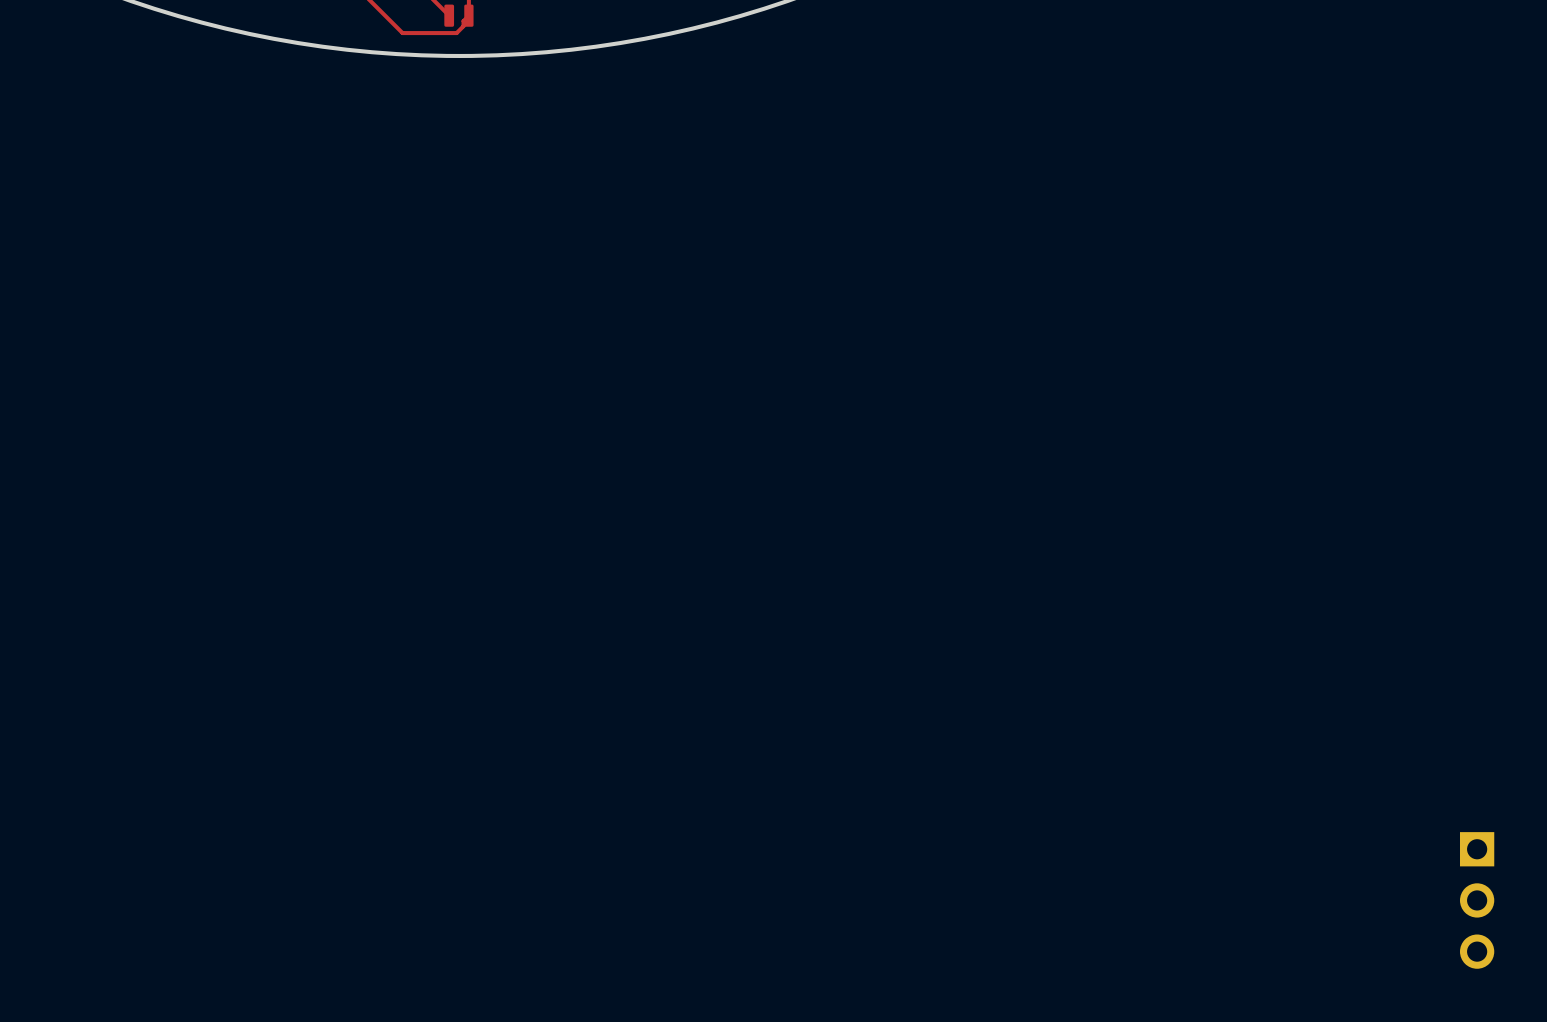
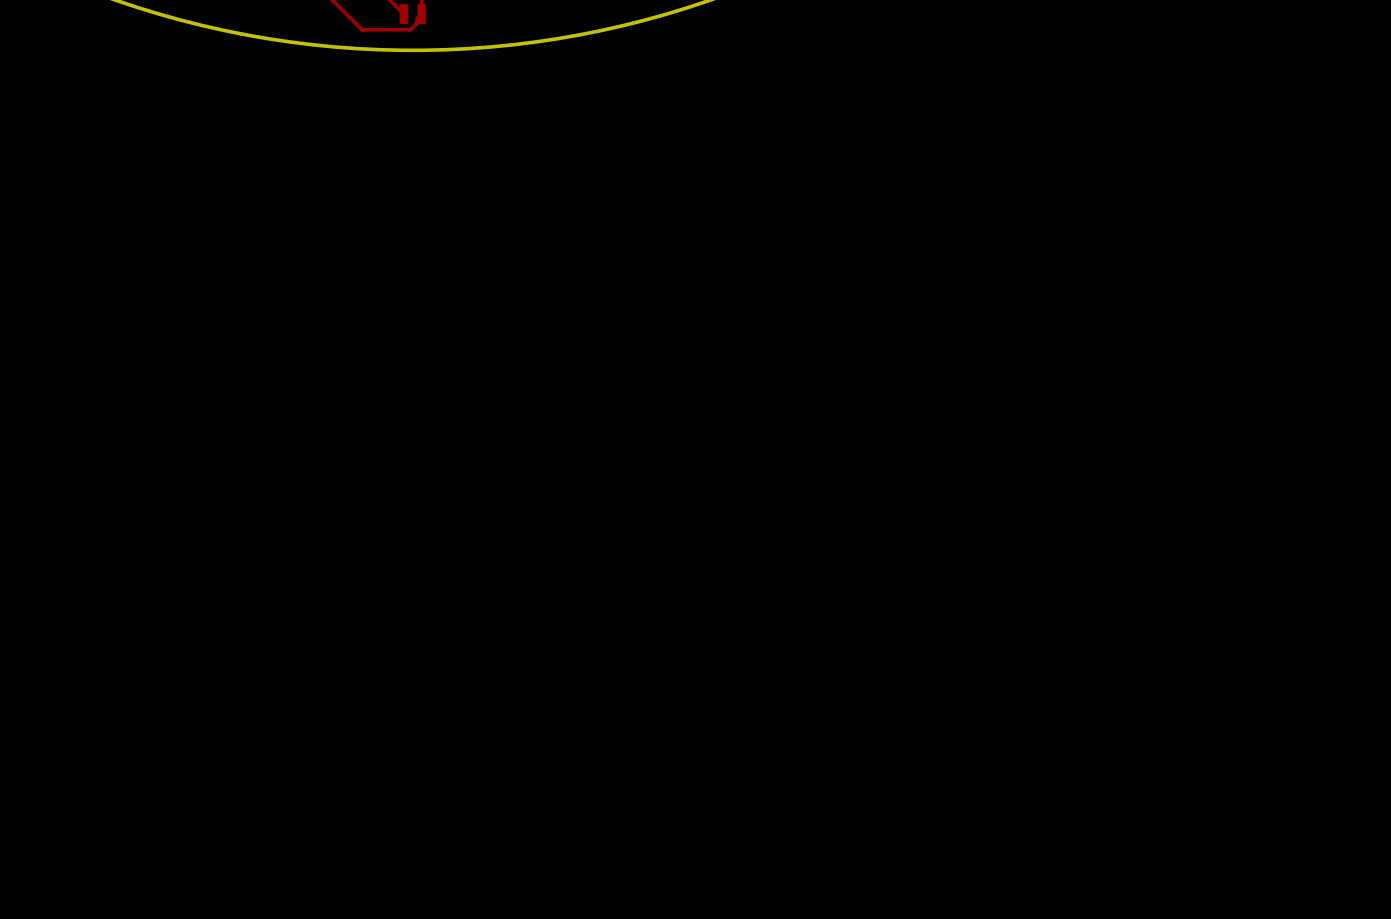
part: (1477, 900) -> none

